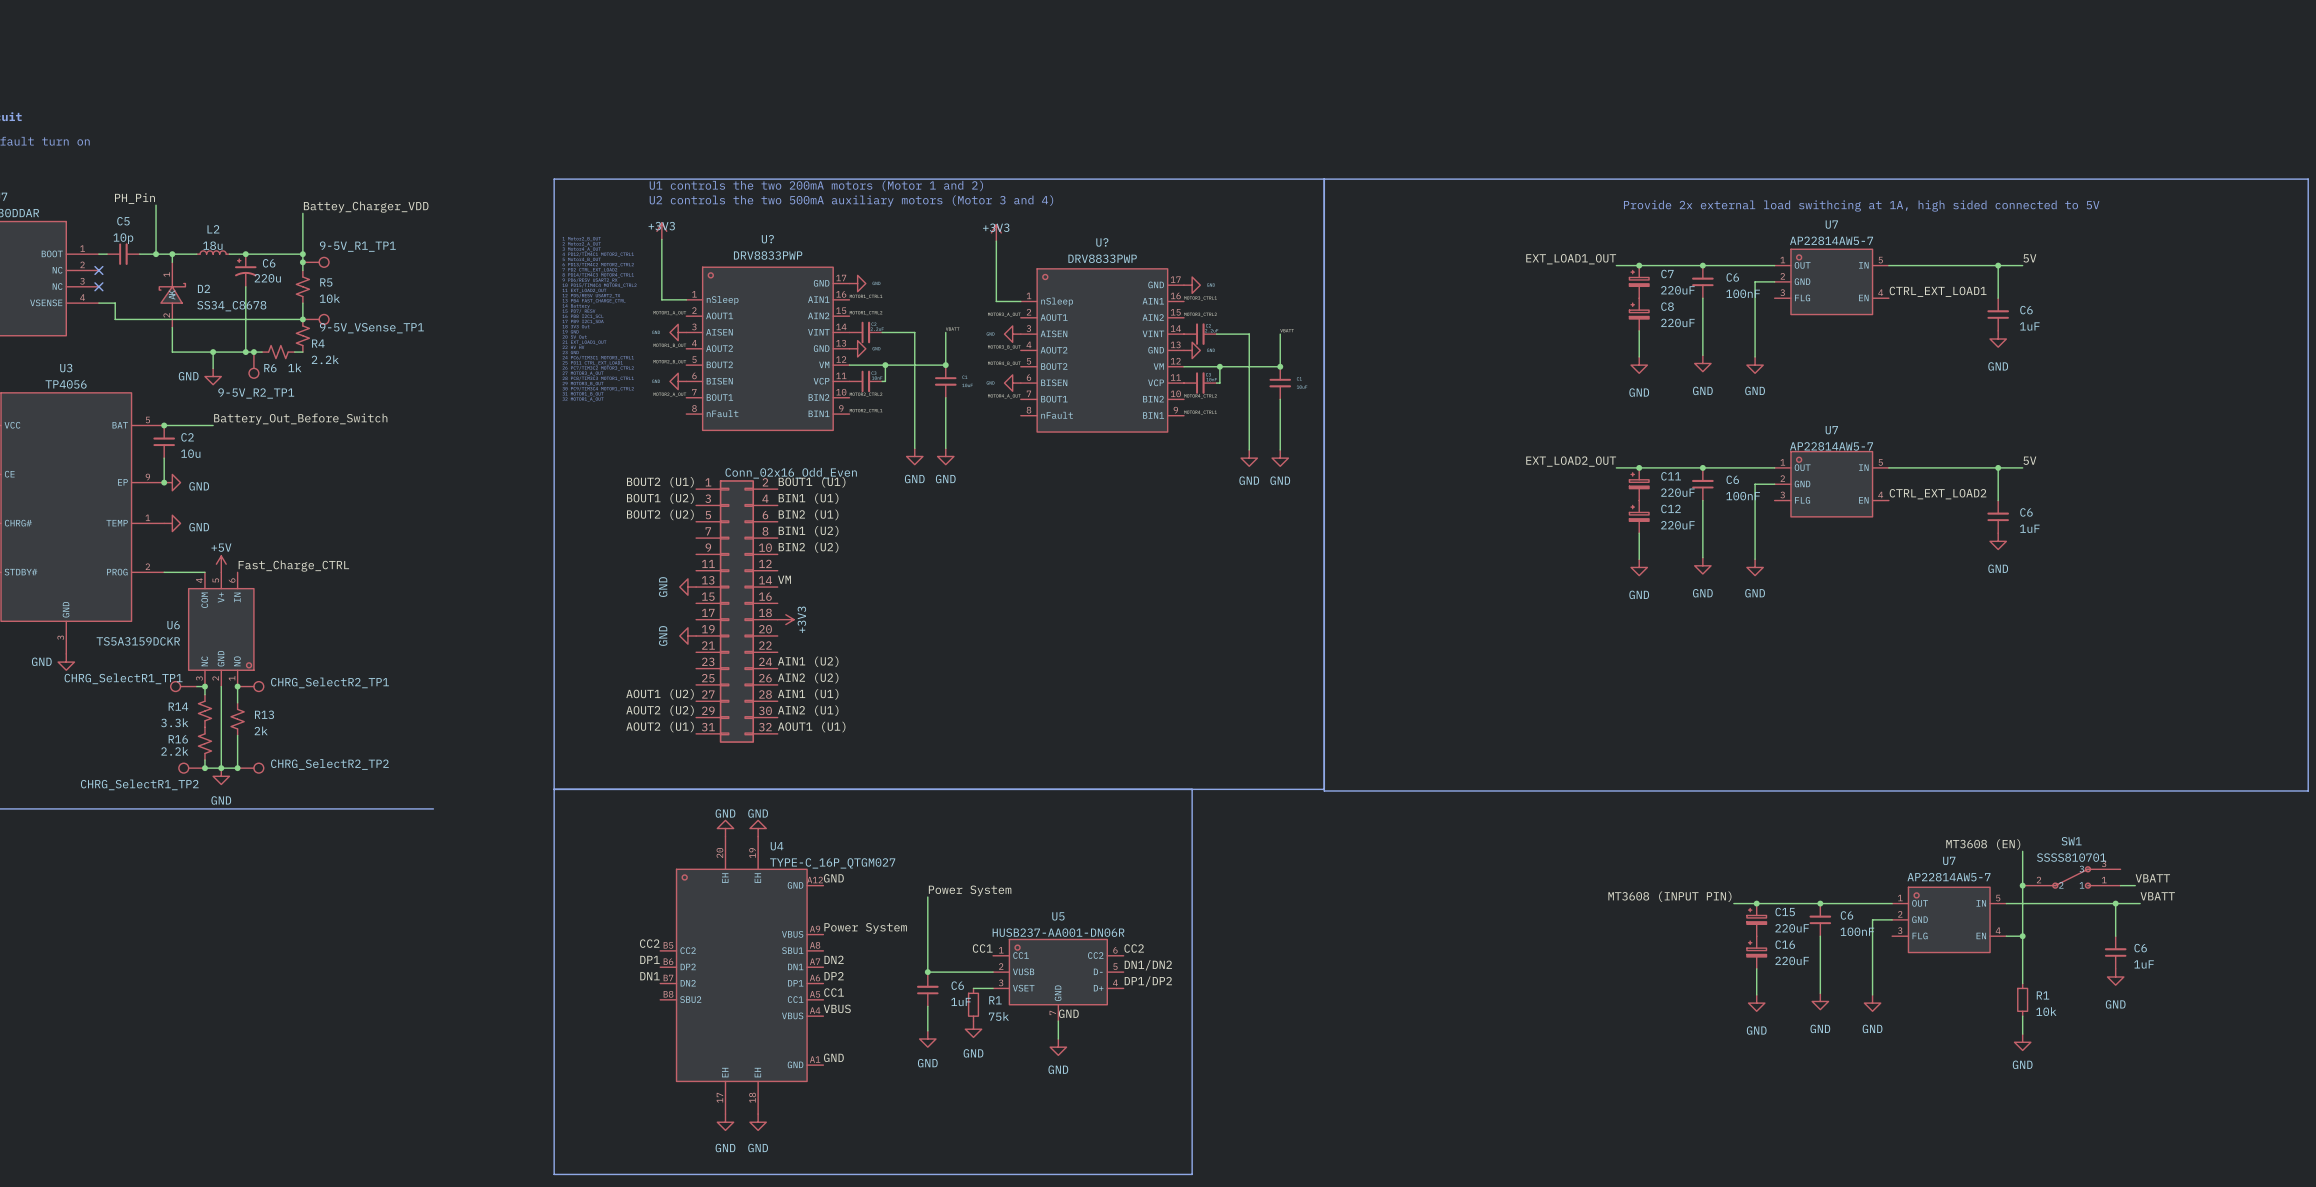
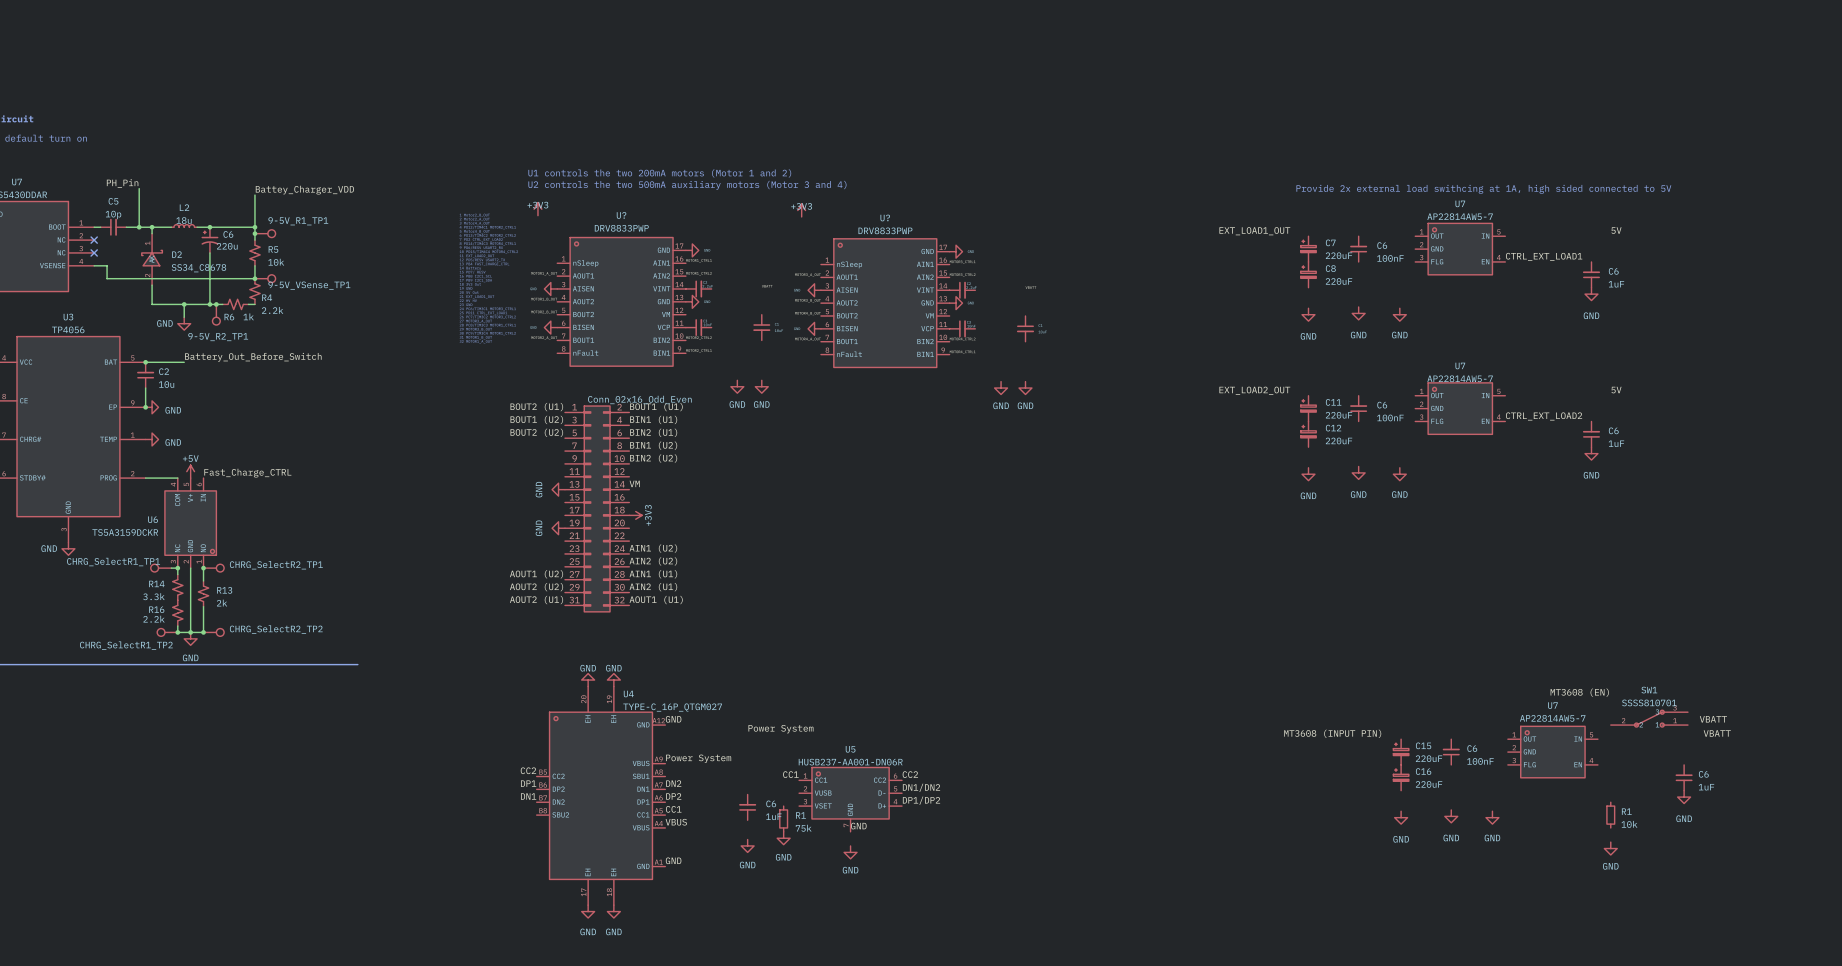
line: (1324, 179) (1324, 790) (2308, 790) (2308, 179) (554, 179) (554, 1174) (1192, 1174) (1192, 789) -> none
wire: (661, 239) (661, 299) (686, 299) -> none
wire: (996, 241) (996, 301) (1020, 301) -> none
wire: (1616, 265) (1774, 265) -> none
junction: (1639, 265) -> none
junction: (1702, 265) -> none
wire: (1888, 265) (2022, 265) -> none
wire: (1998, 265) (1998, 298) -> none
junction: (1998, 265) -> none
wire: (1774, 281) (1755, 281) (1755, 356) -> none
wire: (1702, 298) (1702, 355) -> none
wire: (1639, 330) (1639, 356) -> none
wire: (882, 332) (914, 332) (914, 448) -> none
wire: (945, 332) (945, 365) (849, 365) -> none
wire: (1216, 334) (1249, 334) (1249, 449) -> none
wire: (1280, 334) (1280, 366) (1183, 366) -> none
wire: (885, 365) (885, 381) (882, 381) -> none
junction: (885, 365) -> none
junction: (945, 365) -> none
wire: (1219, 366) (1219, 383) (1216, 383) -> none
junction: (1219, 366) -> none
junction: (1280, 366) -> none
wire: (945, 397) (945, 448) -> none
wire: (1280, 399) (1280, 449) -> none
wire: (1616, 467) (1774, 467) -> none
junction: (1639, 467) -> none
junction: (1702, 467) -> none
wire: (1888, 467) (2022, 467) -> none
wire: (1998, 467) (1998, 500) -> none
junction: (1998, 467) -> none
wire: (1774, 484) (1755, 484) (1755, 559) -> none
wire: (1702, 500) (1702, 557) -> none
wire: (1639, 533) (1639, 559) -> none
line: (554, 789) (1324, 789) -> none
wire: (2022, 851) (2022, 983) -> none
junction: (2022, 885) -> none
wire: (2120, 885) (2135, 885) -> none
wire: (927, 897) (927, 973) -> none
wire: (1733, 903) (1892, 903) -> none
junction: (1756, 903) -> none
junction: (1820, 903) -> none
wire: (2006, 903) (2140, 903) -> none
wire: (2115, 903) (2115, 936) -> none
junction: (2115, 903) -> none
wire: (1892, 919) (1872, 919) (1872, 994) -> none
wire: (1820, 936) (1820, 993) -> none
wire: (2006, 936) (2022, 936) -> none
junction: (2022, 936) -> none
wire: (1756, 968) (1756, 994) -> none
wire: (927, 972) (993, 972) -> none
junction: (927, 972) -> none
wire: (973, 988) (993, 988) -> none
wire: (927, 1006) (927, 1030) -> none
wire: (2022, 1016) (2022, 1034) -> none
wire: (1058, 1021) (1058, 1039) -> none

